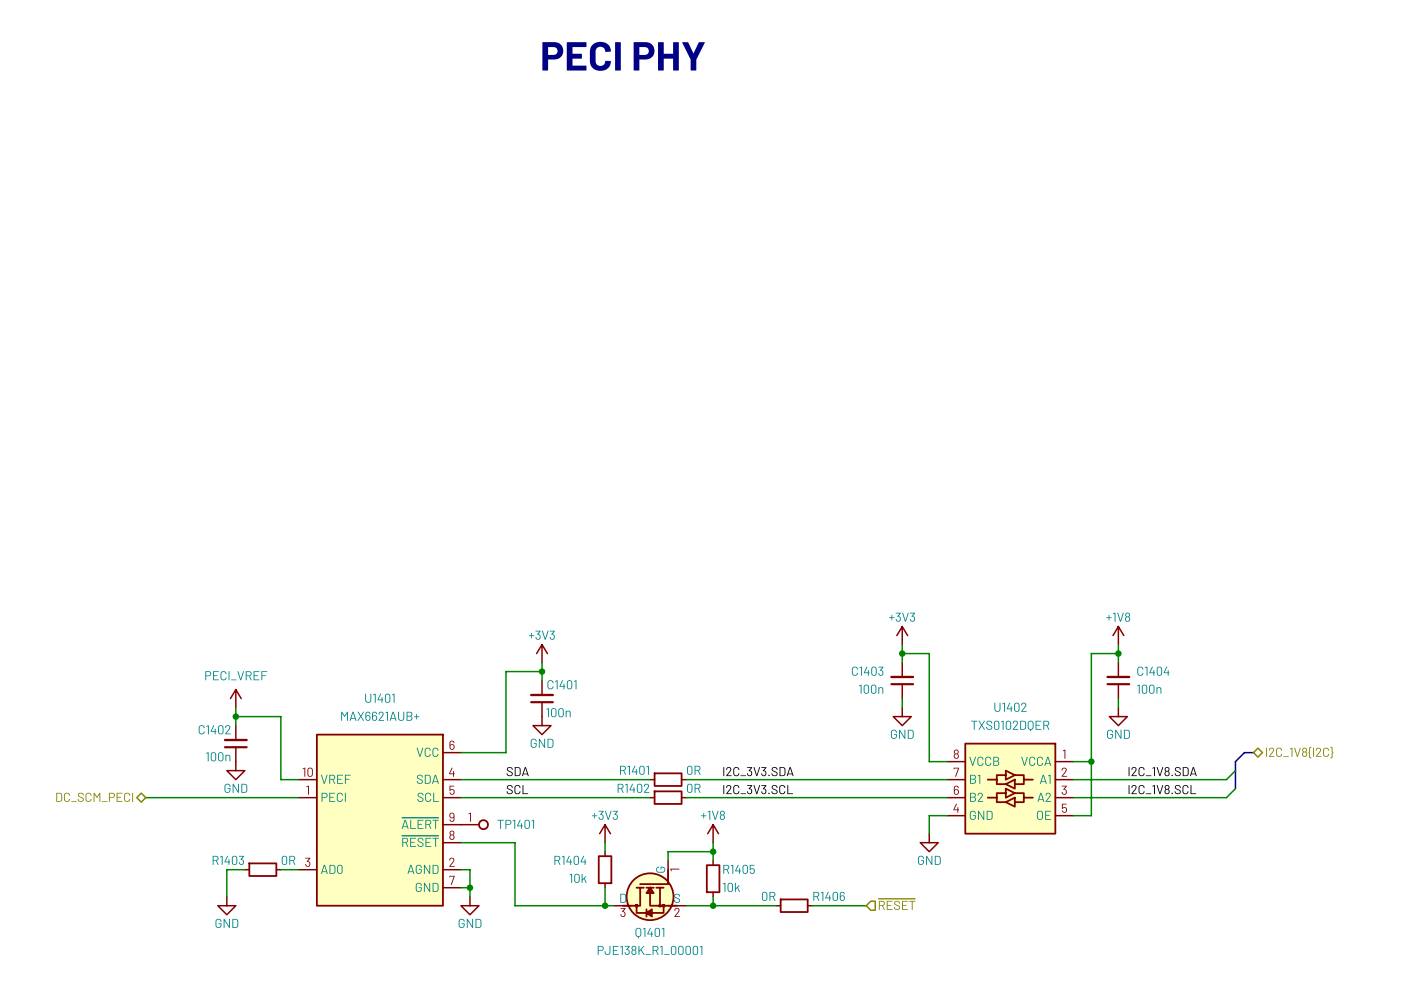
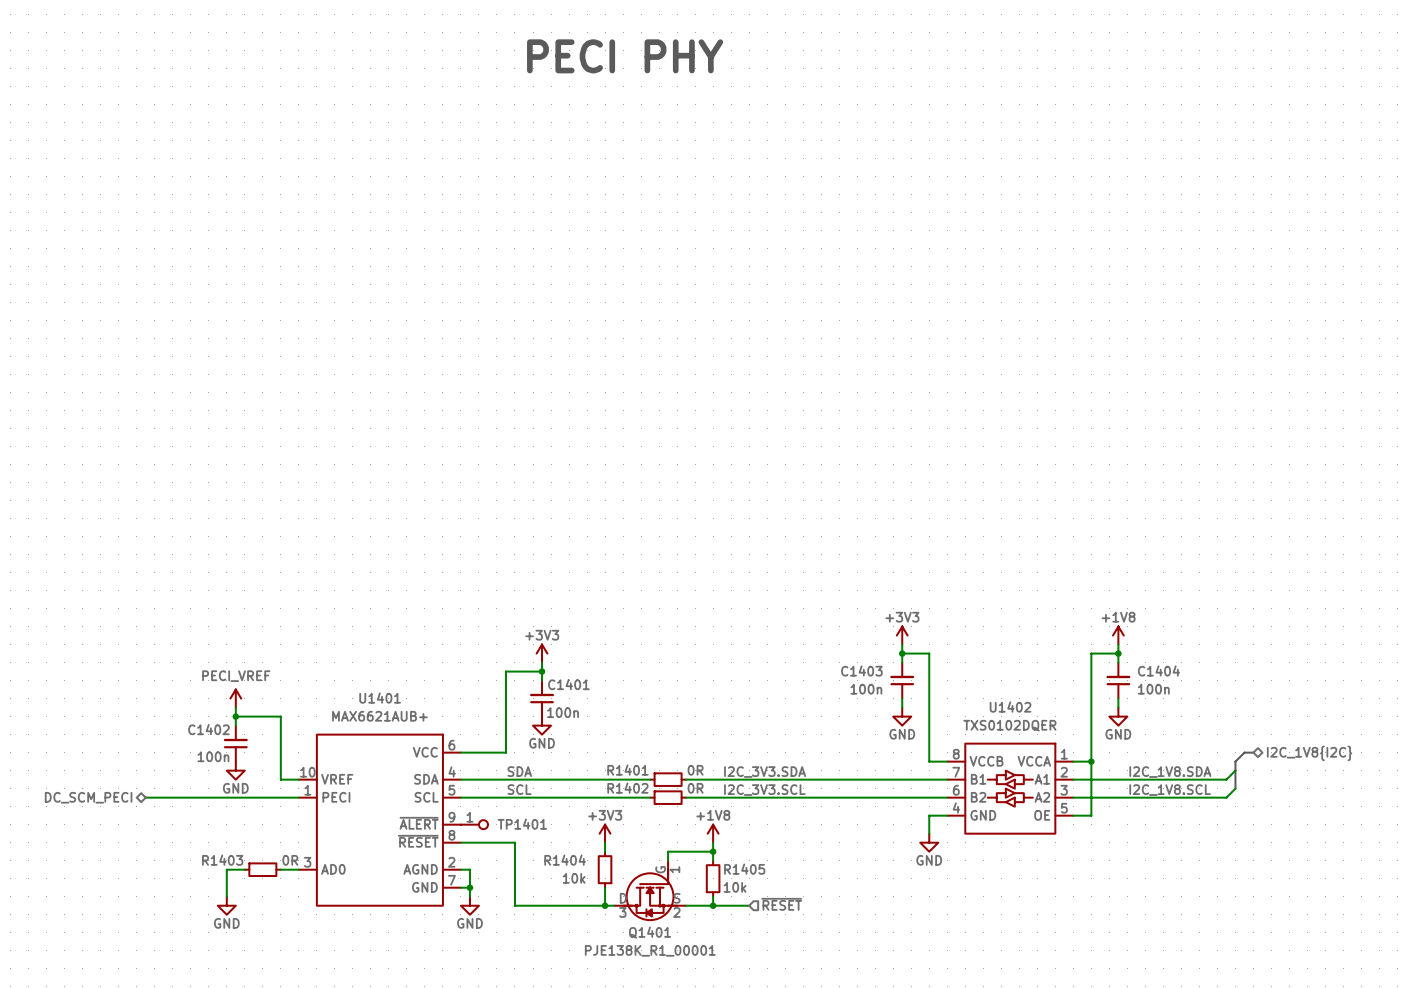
hierarchical label position: ~{RESET} (896, 904) -> ~{RESET} (781, 904)
wire: (749, 905) (776, 905) -> none
R1406: (794, 905) -> none
wire: (812, 905) (866, 905) -> none

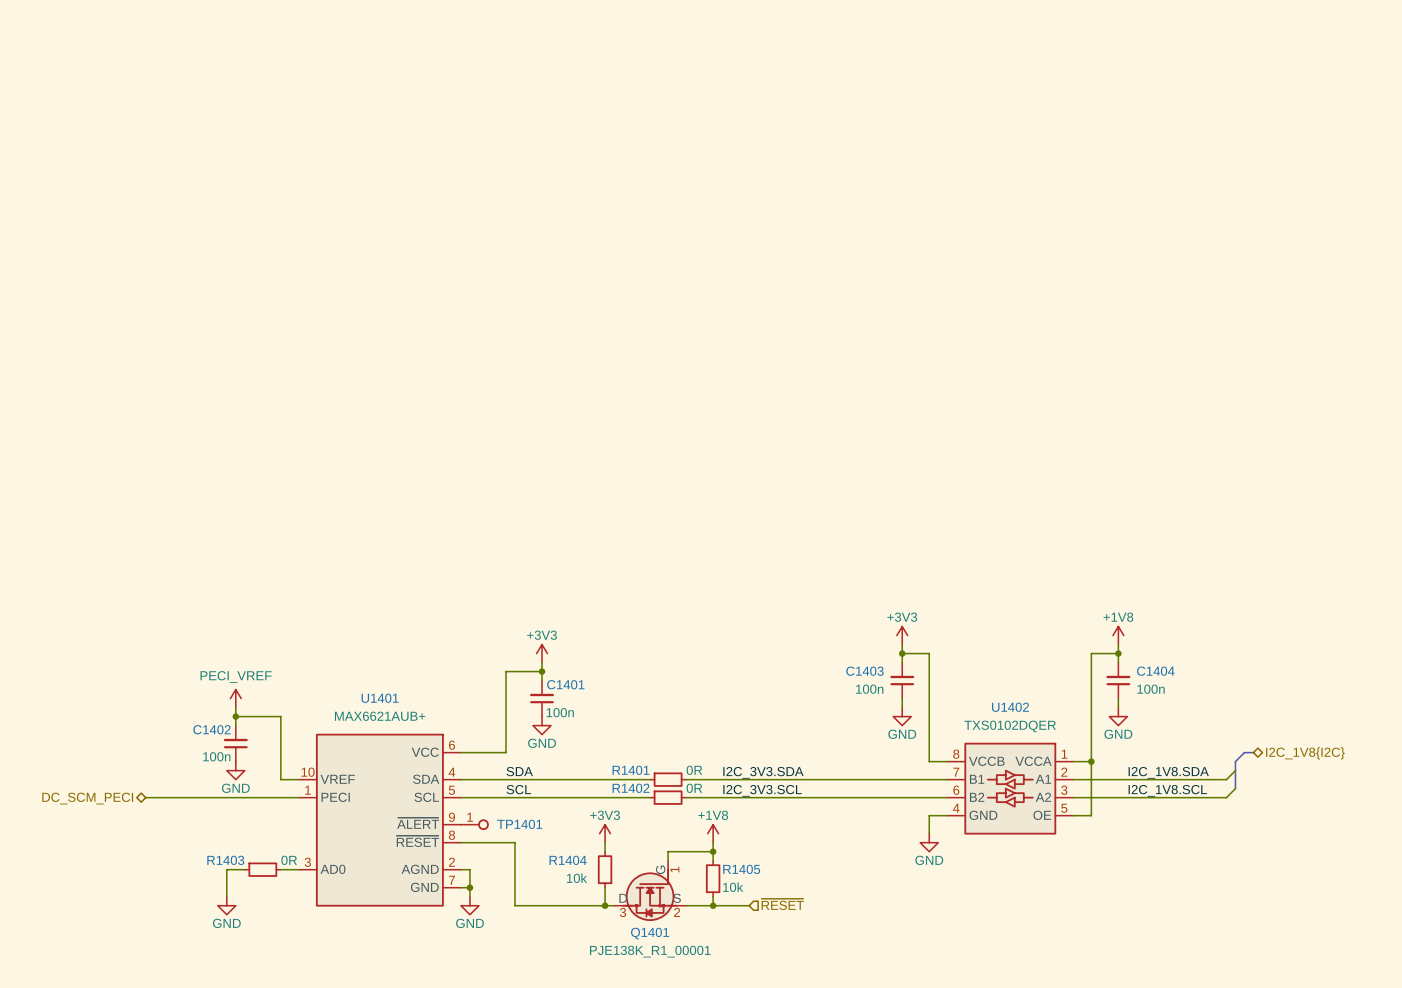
text: PECI PHY (625, 56) -> none

